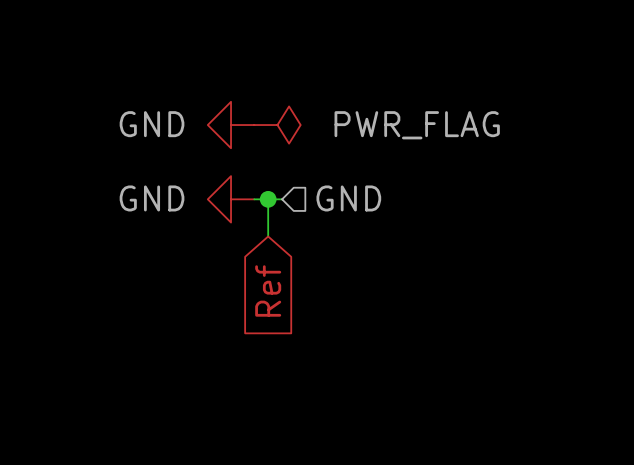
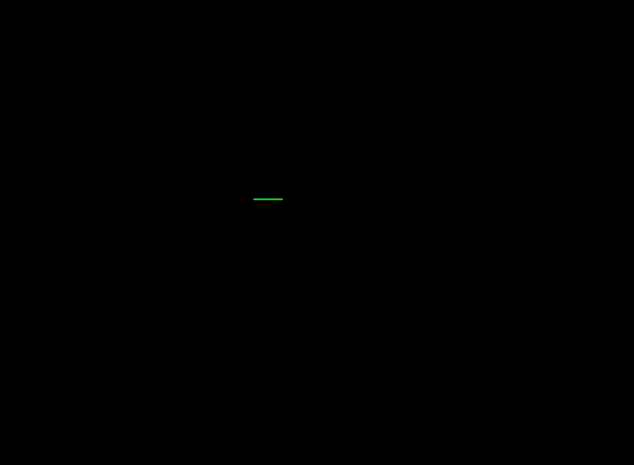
power symbol: GND (231, 125) -> none
power symbol: PWR_FLAG (277, 125) -> none
hierarchical label: GND (348, 198) -> none
power symbol: GND (231, 199) -> none
wire: (268, 199) (268, 236) -> none
junction: (268, 199) -> none
global label: Ref (268, 290) -> none

